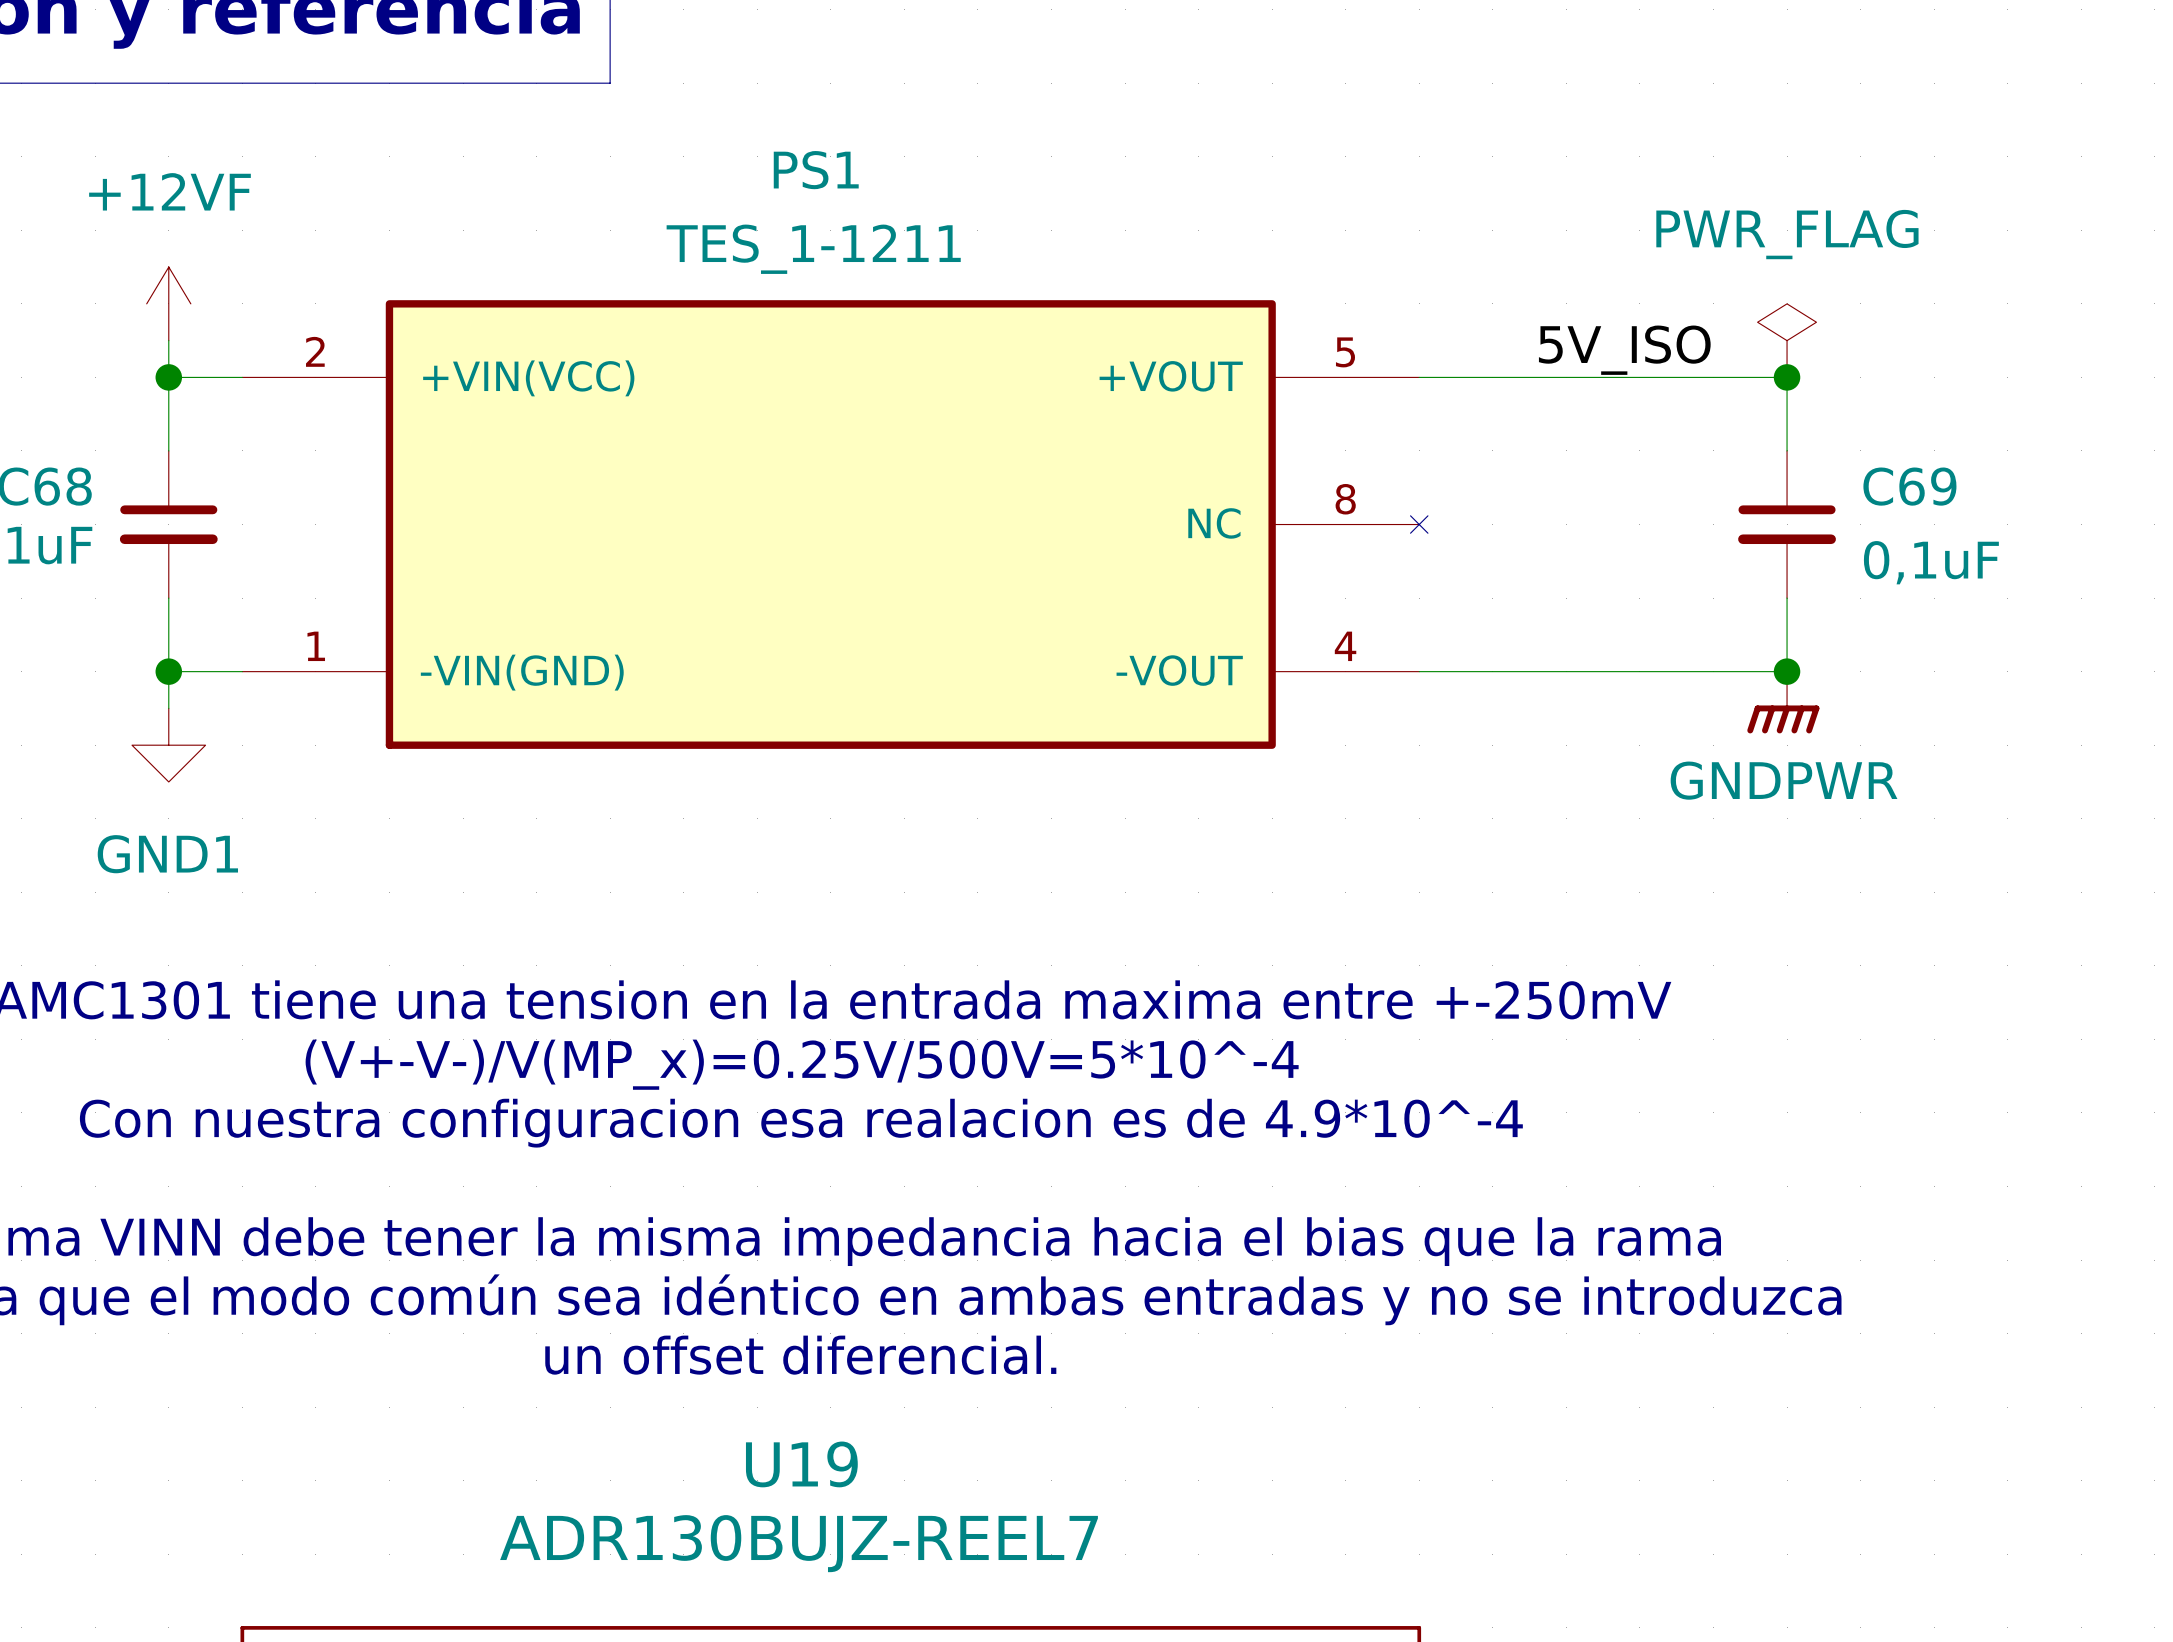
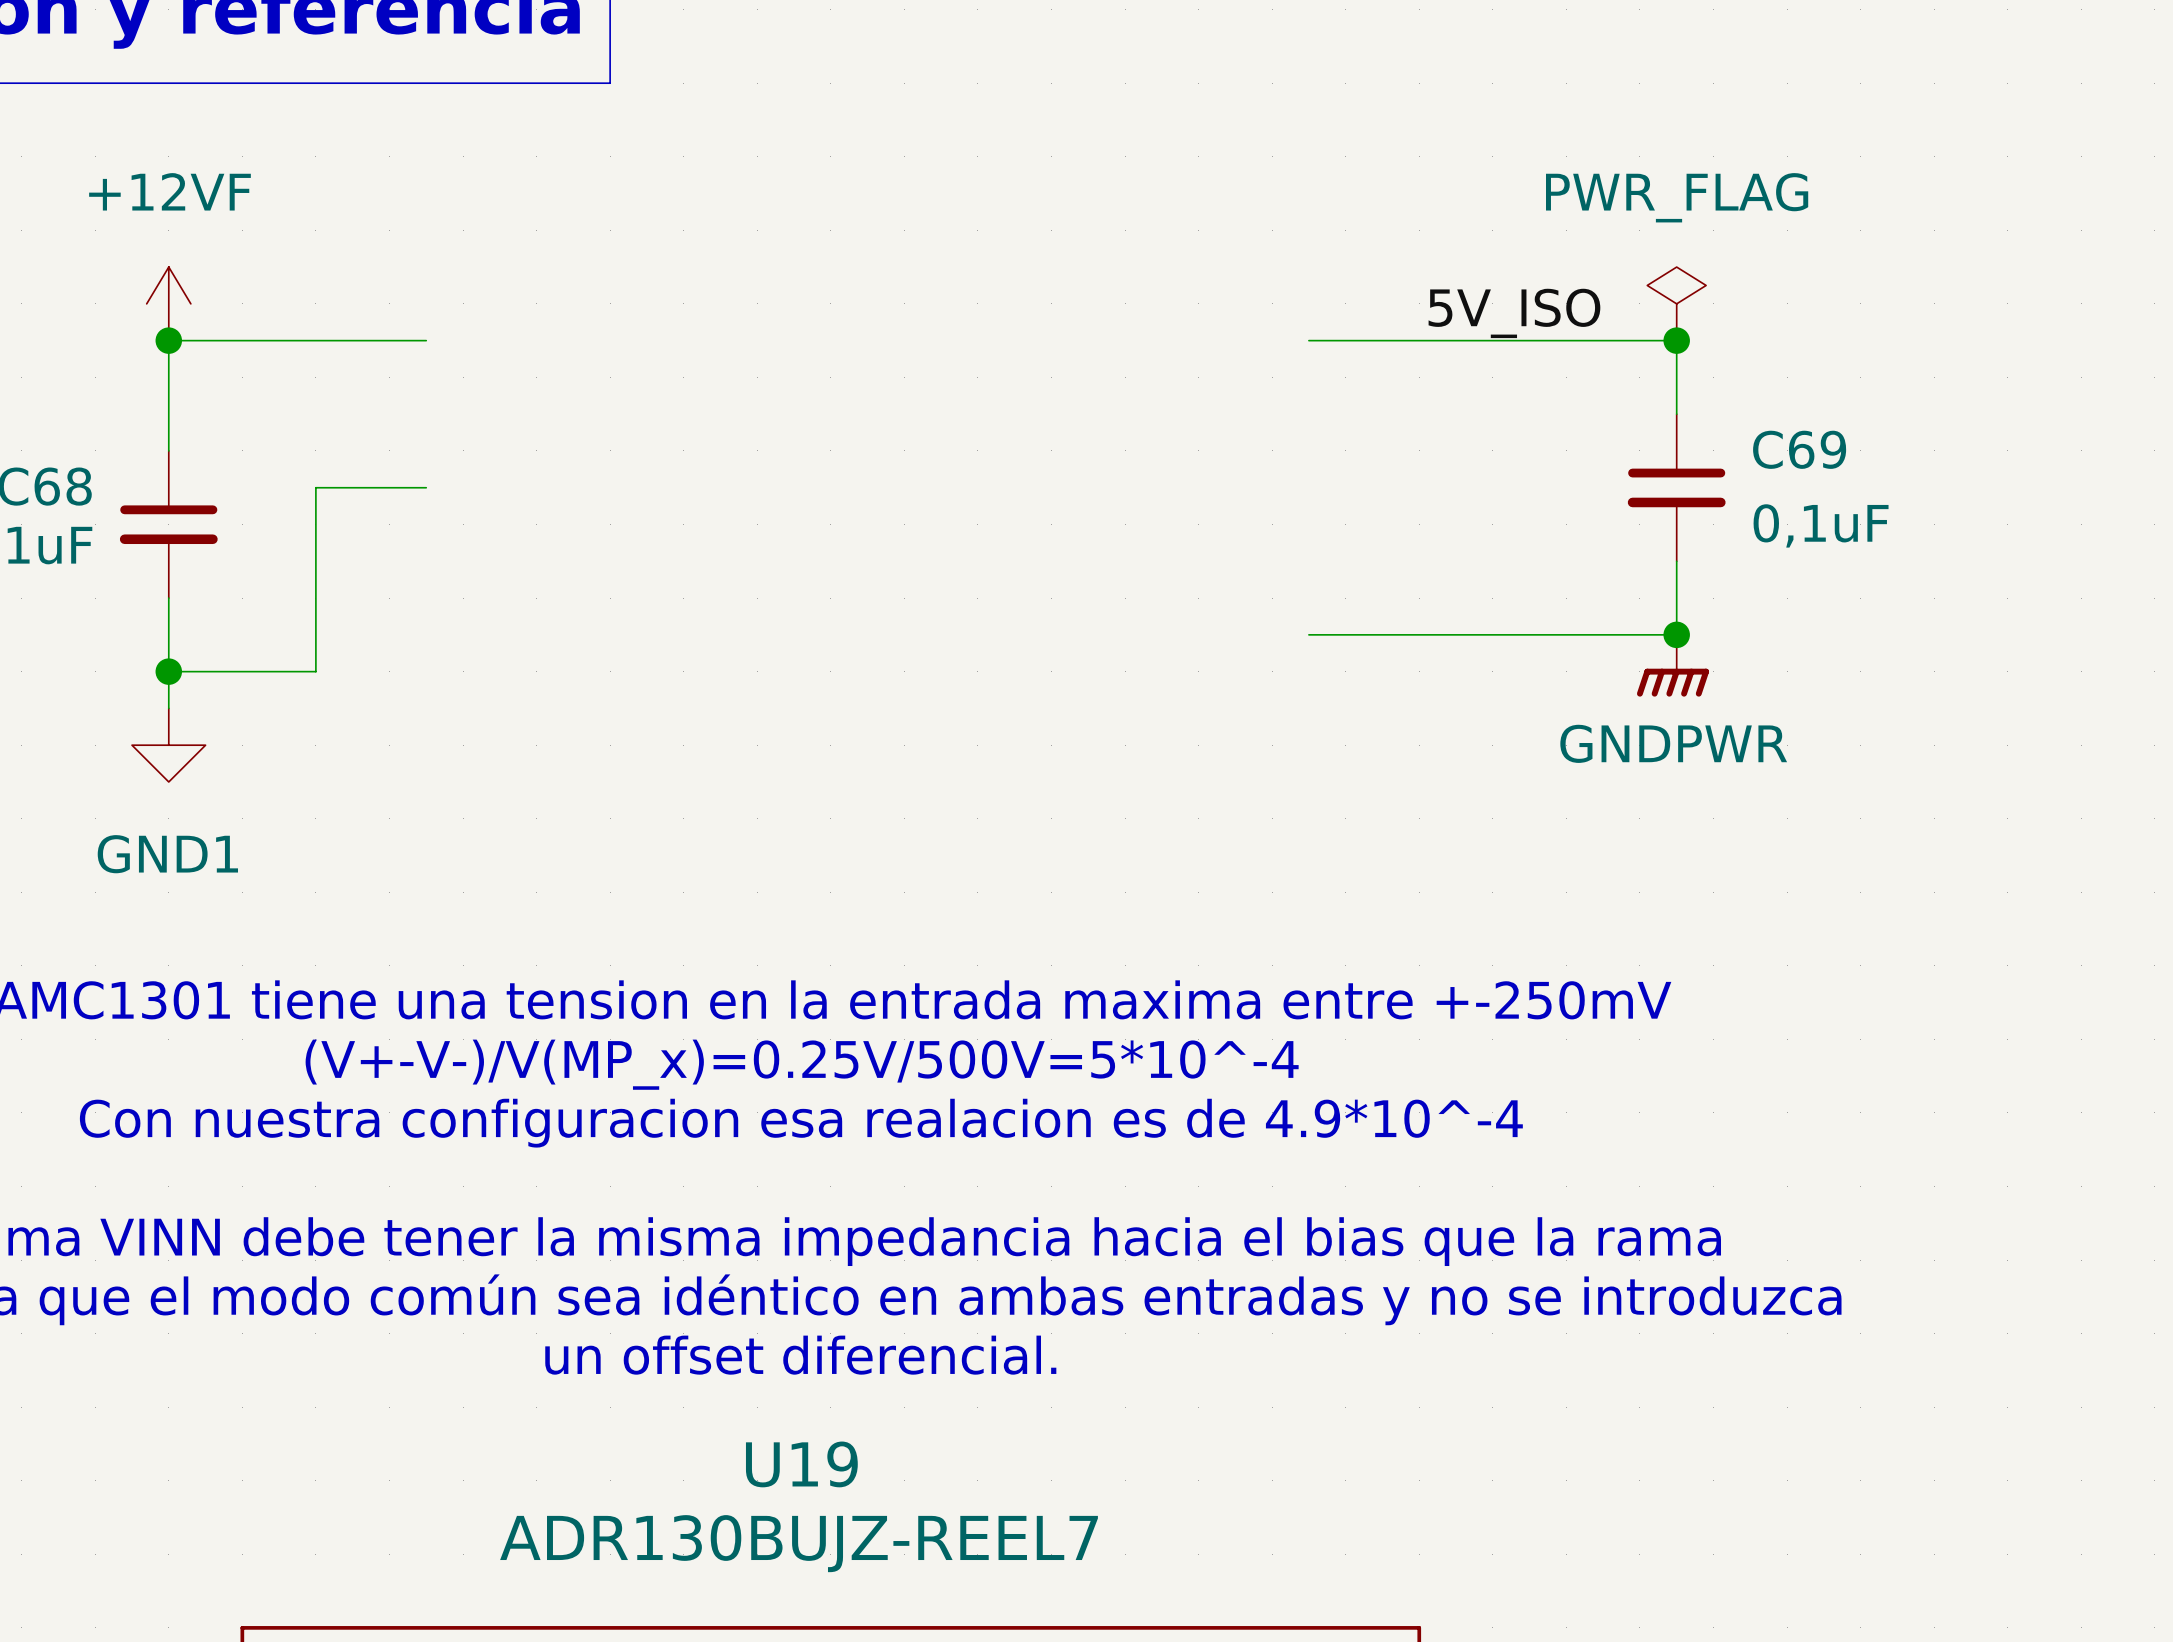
wire: none -> (168, 340) (426, 340)
power symbol position: PWR_FLAG (1787, 340) -> PWR_FLAG (1676, 303)
label position: 5V_ISO (1624, 350) -> 5V_ISO (1514, 313)
wire: (168, 377) (242, 377) -> none
junction position: (168, 377) -> (168, 340)
wire: (1419, 377) (1787, 377) (1787, 450) -> (1308, 340) (1676, 340) (1676, 414)
junction position: (1787, 377) -> (1676, 340)
wire: none -> (426, 487) (315, 487) (315, 671) (242, 671)
PS1: TES_1-1211 (835, 524) -> none
C69 position: (1787, 524) -> (1676, 487)
wire: (1787, 598) (1787, 671) (1419, 671) -> (1676, 561) (1676, 634) (1308, 634)
junction position: (1787, 671) -> (1676, 634)
power symbol position: GNDPWR (1783, 702) -> GNDPWR (1673, 665)

